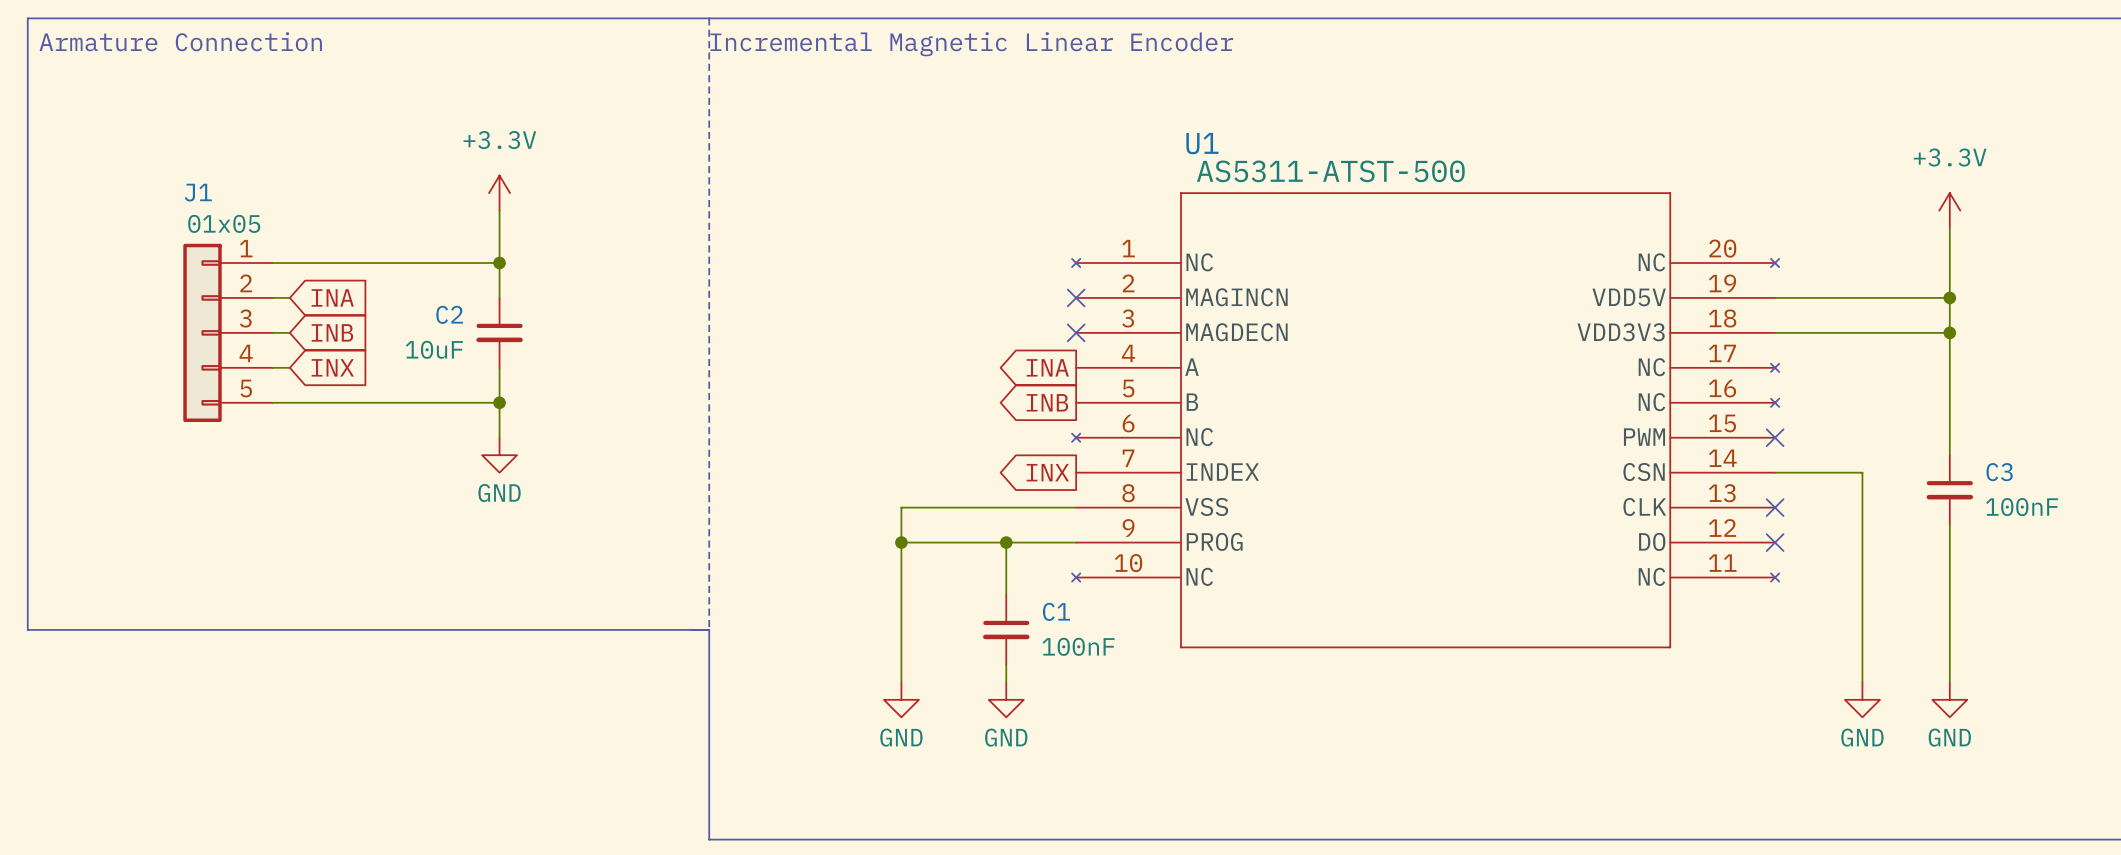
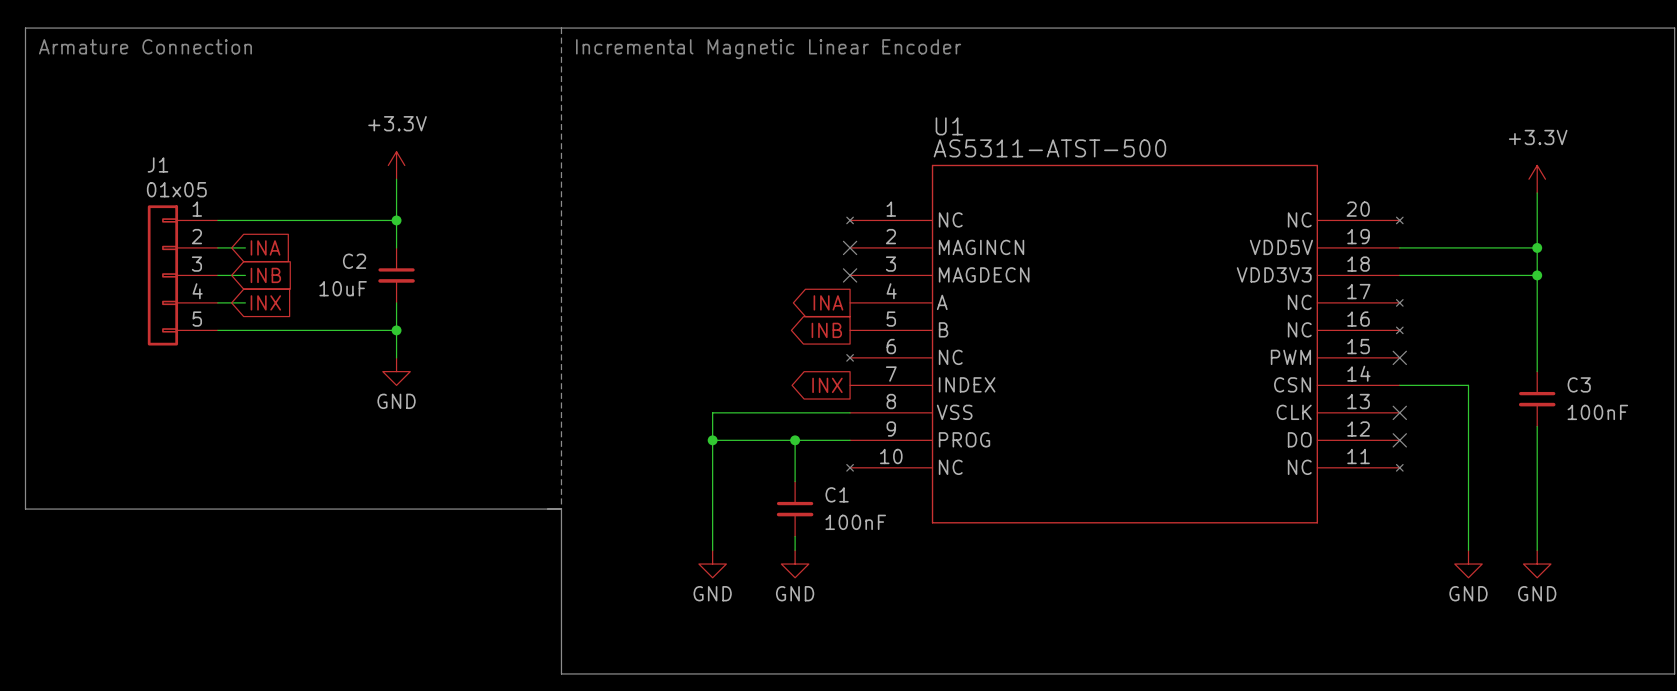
wire: none -> (231, 247) (245, 247)
wire: none -> (231, 275) (245, 275)
wire: none -> (231, 302) (245, 302)

